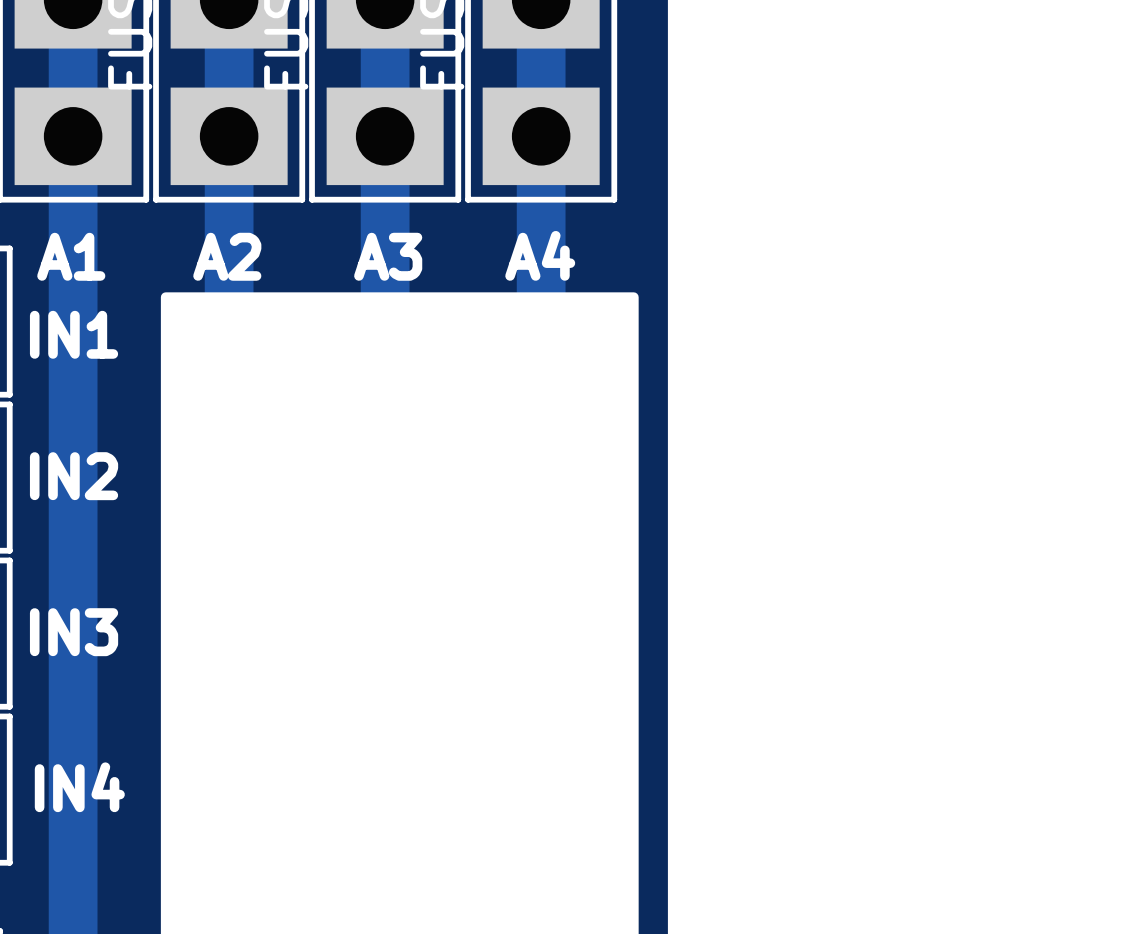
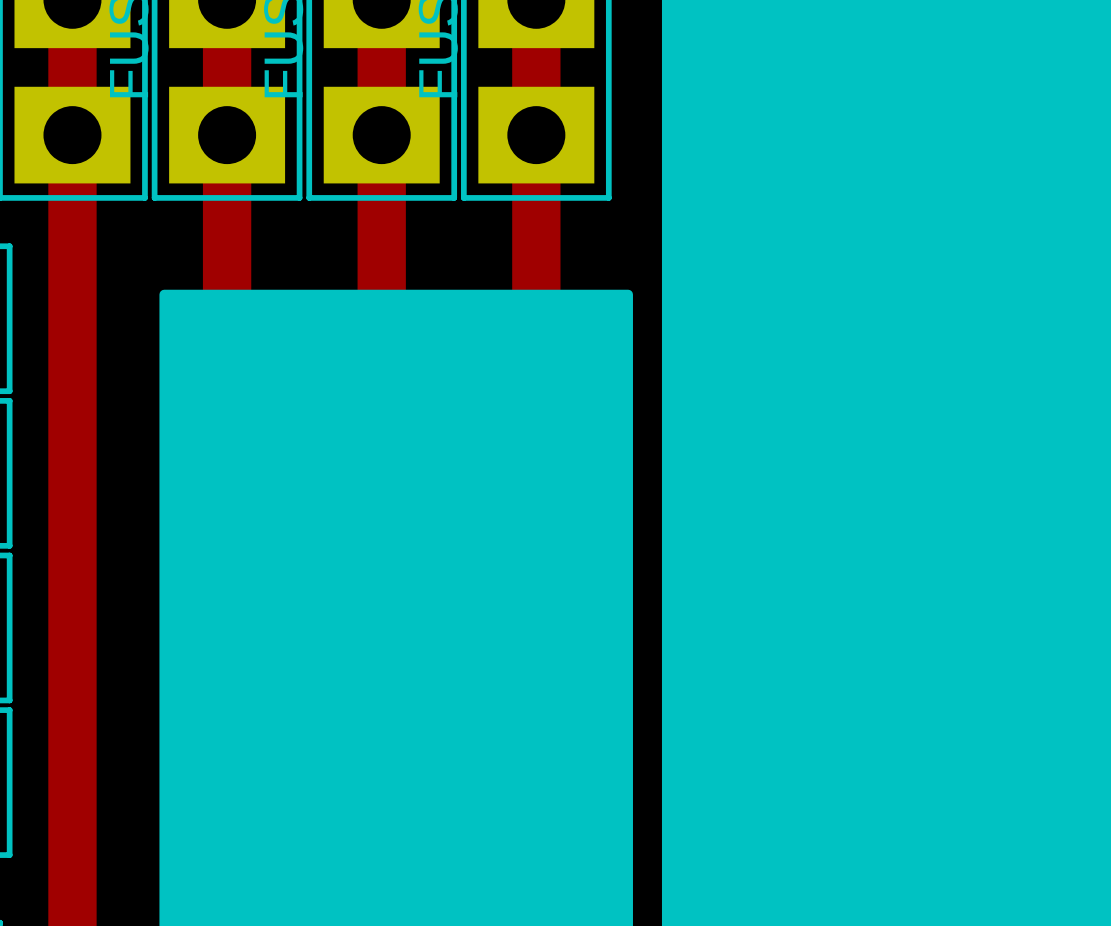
text: A4 (540, 255) -> none
text: A1 (71, 256) -> none
text: A2 (227, 256) -> none
text: A3 (388, 256) -> none
text: IN1 (74, 334) -> none
text: IN2 (74, 476) -> none
text: IN3 (74, 632) -> none
text: IN4 (79, 787) -> none

